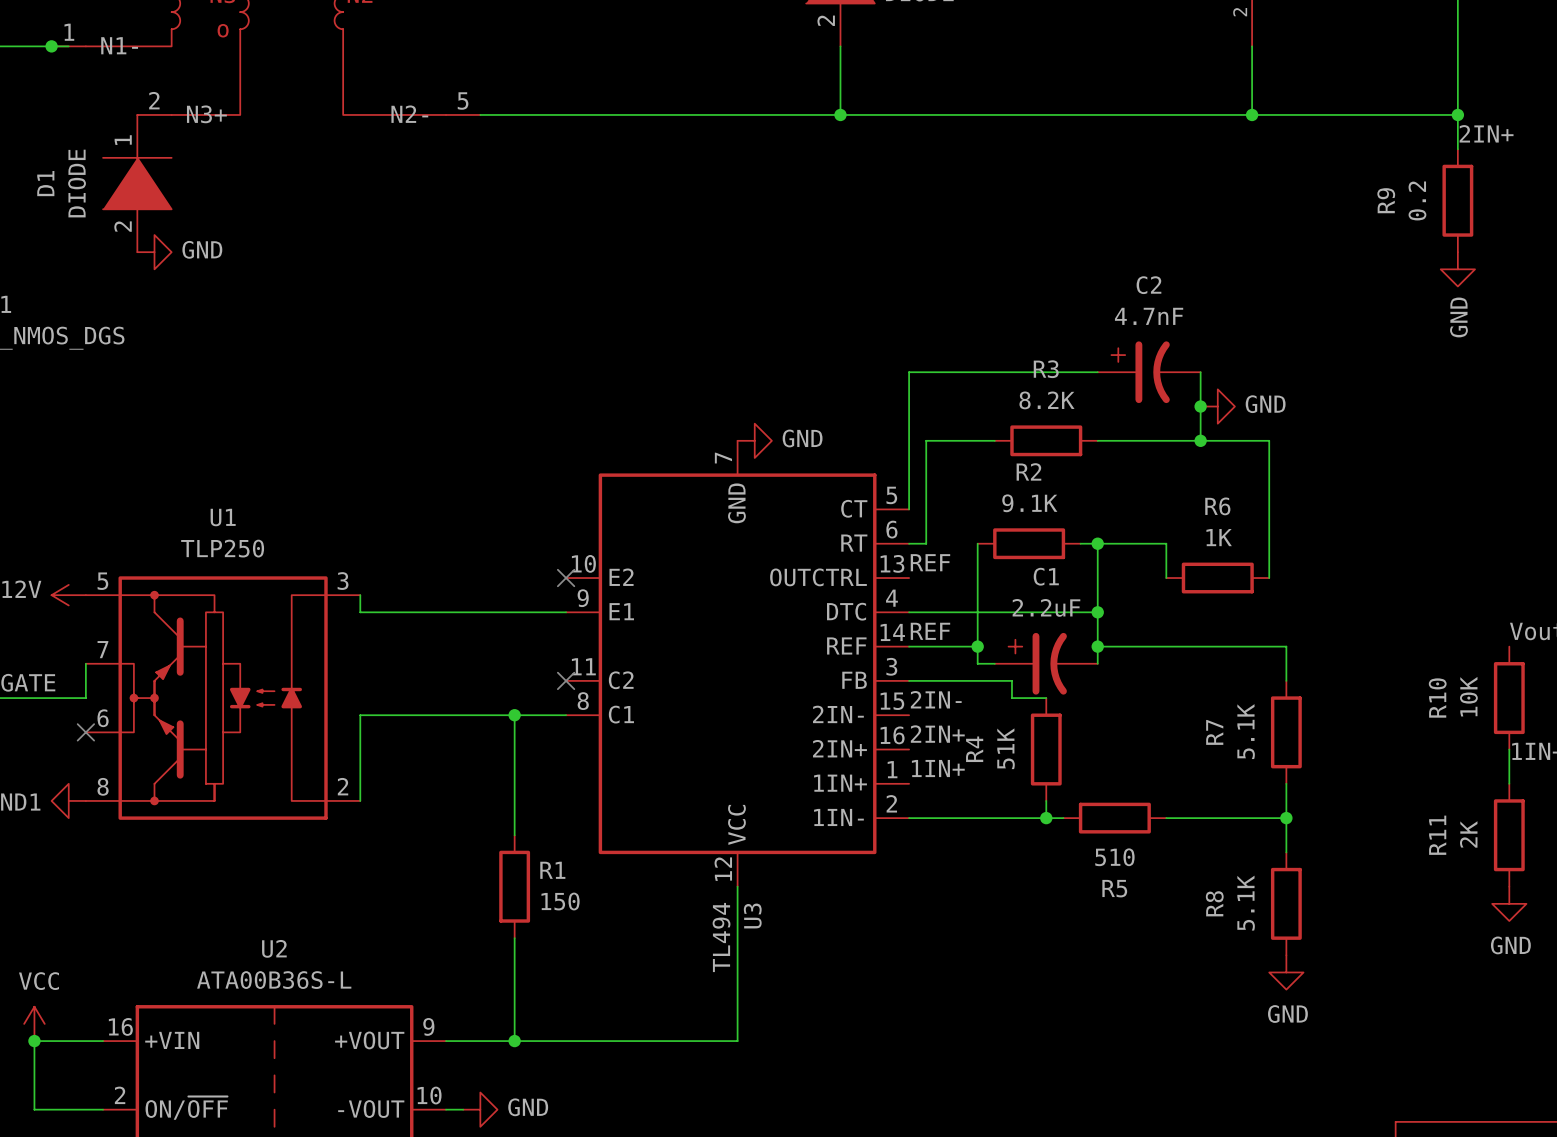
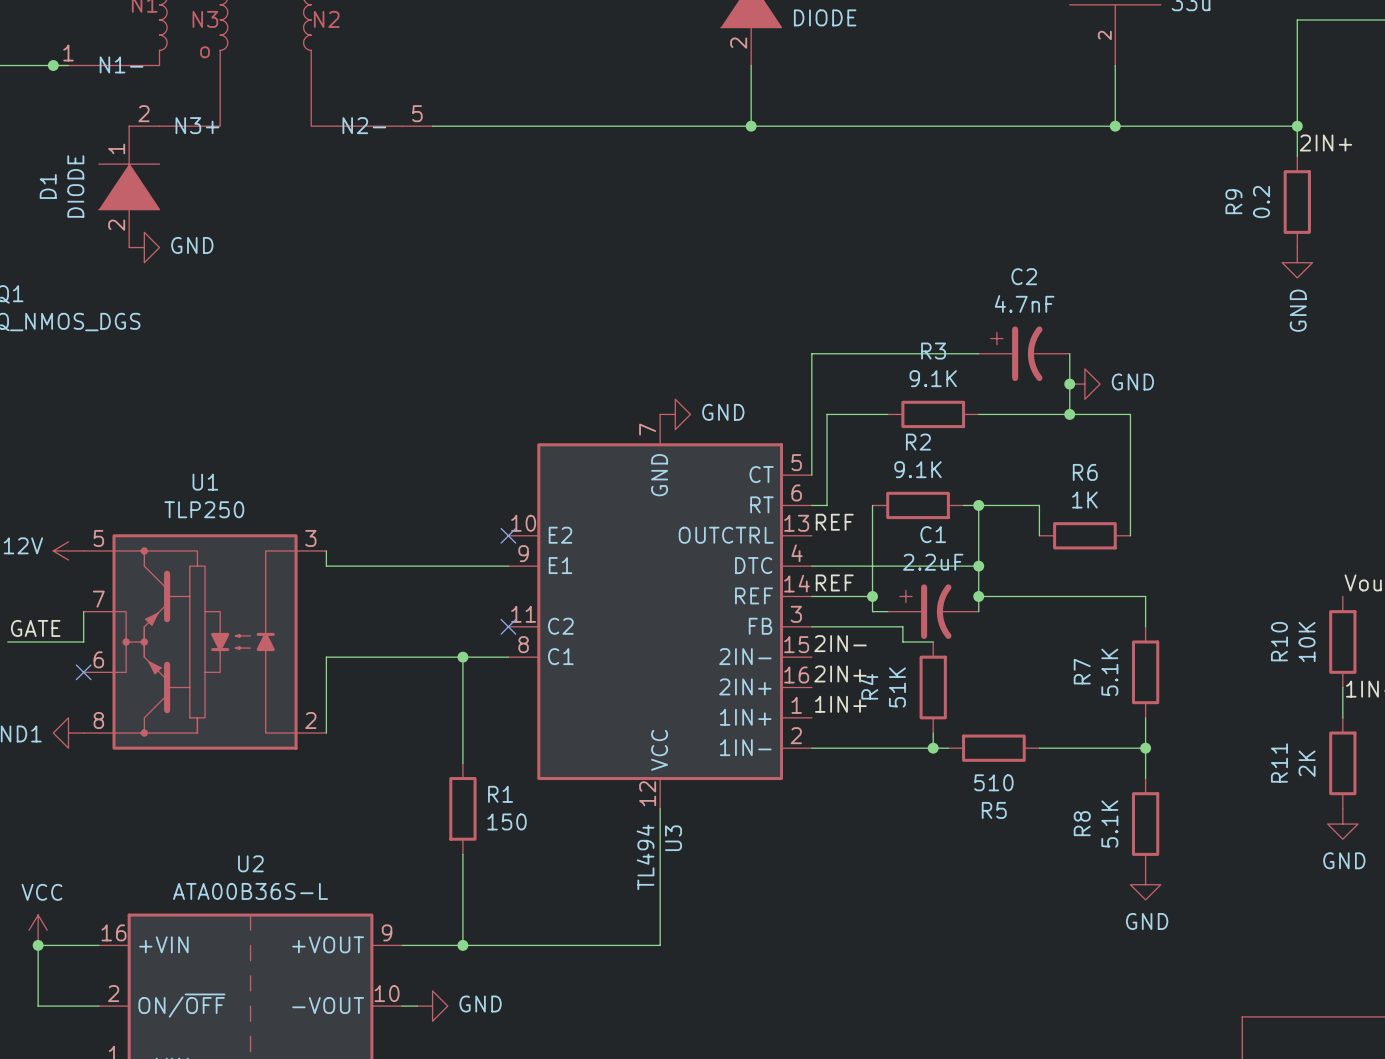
R3 value: 8.2K (1046, 400) -> 9.1K (933, 378)

